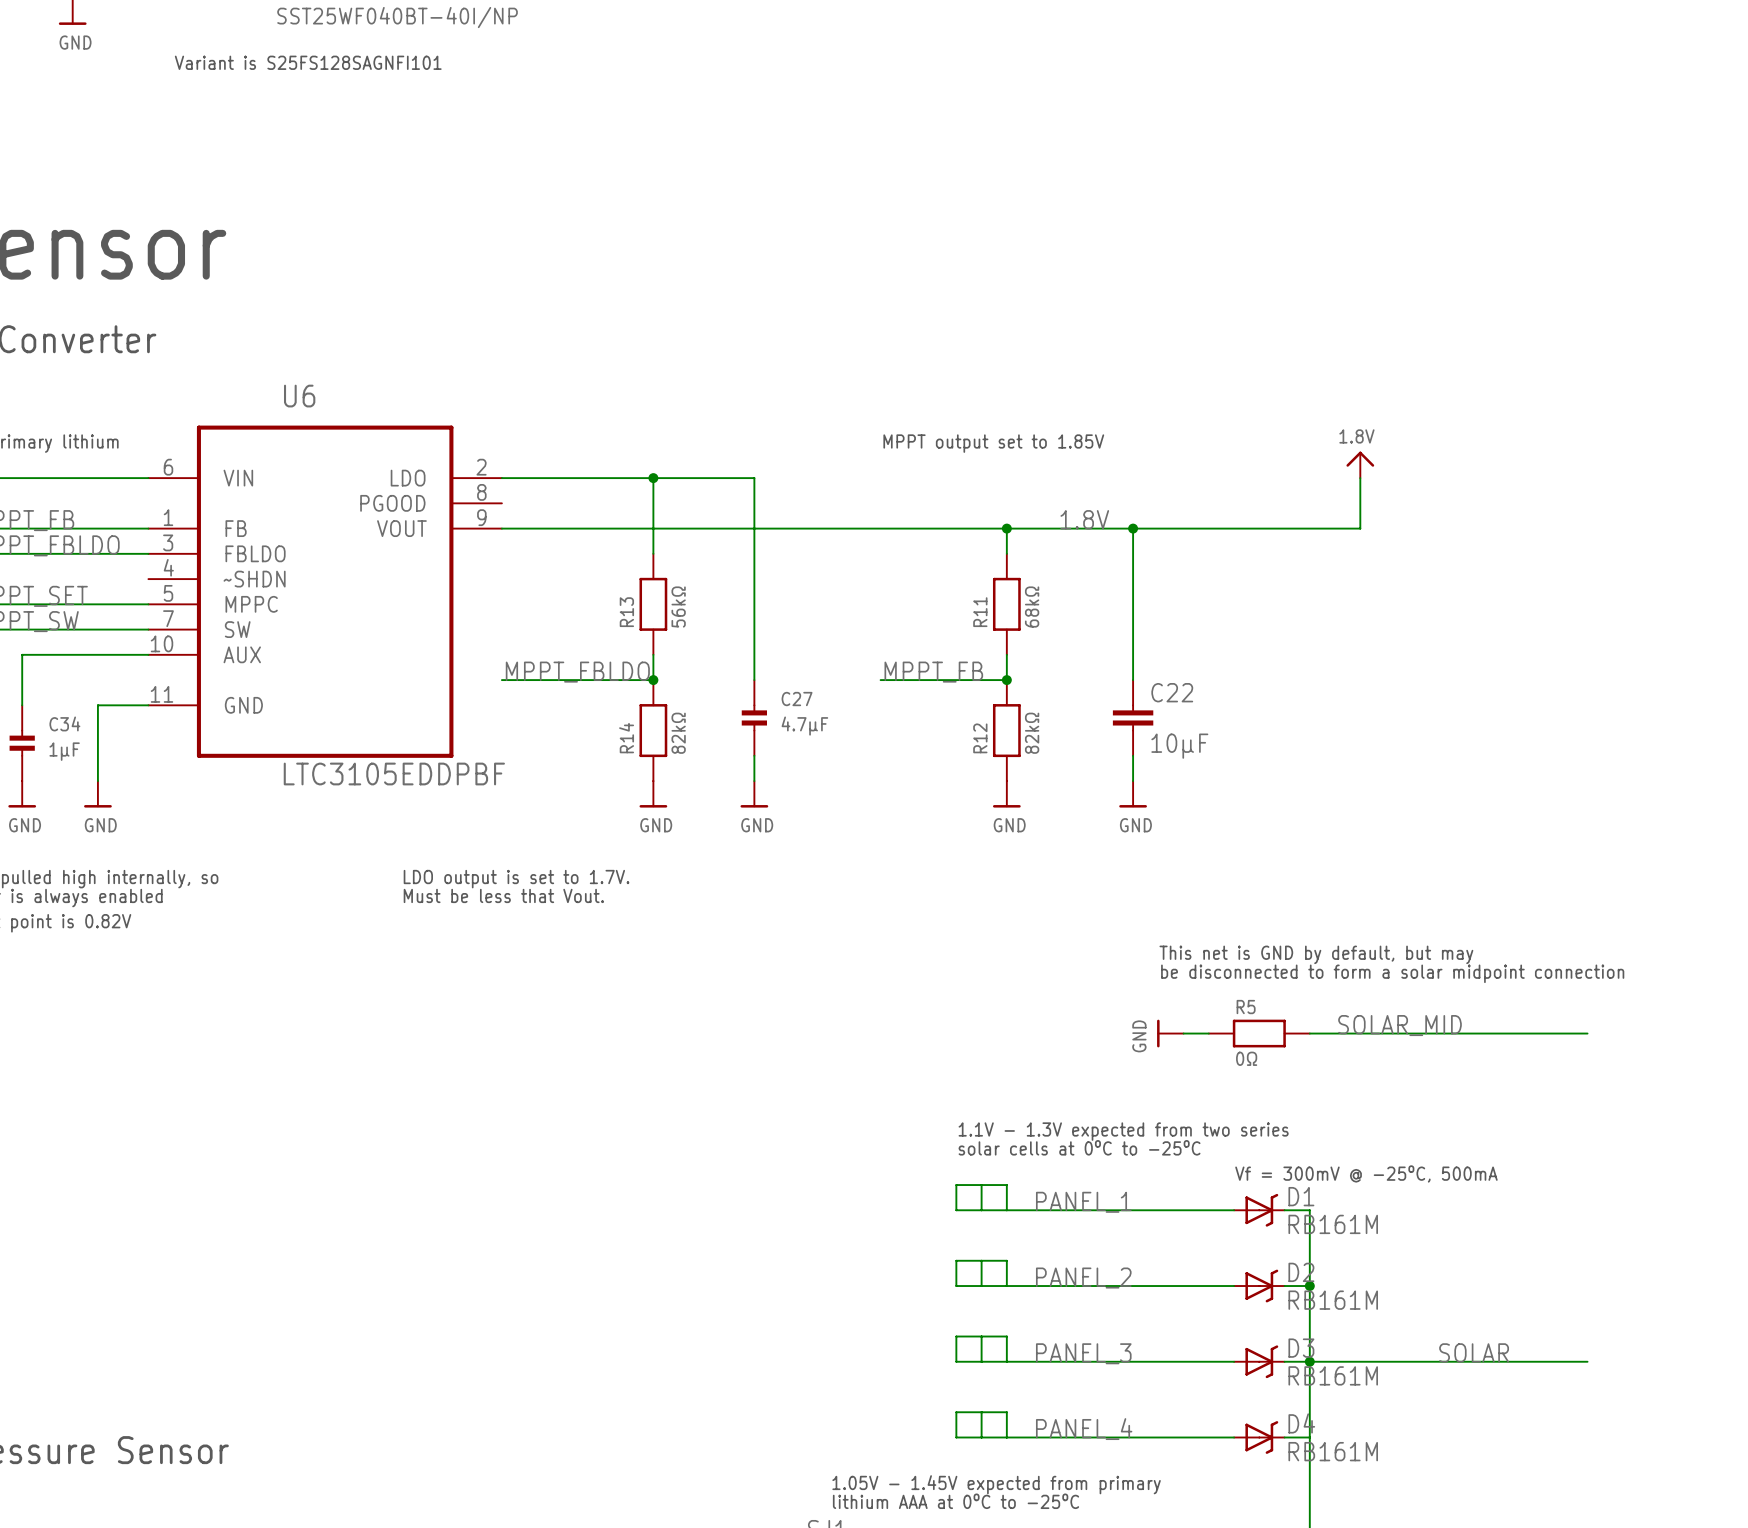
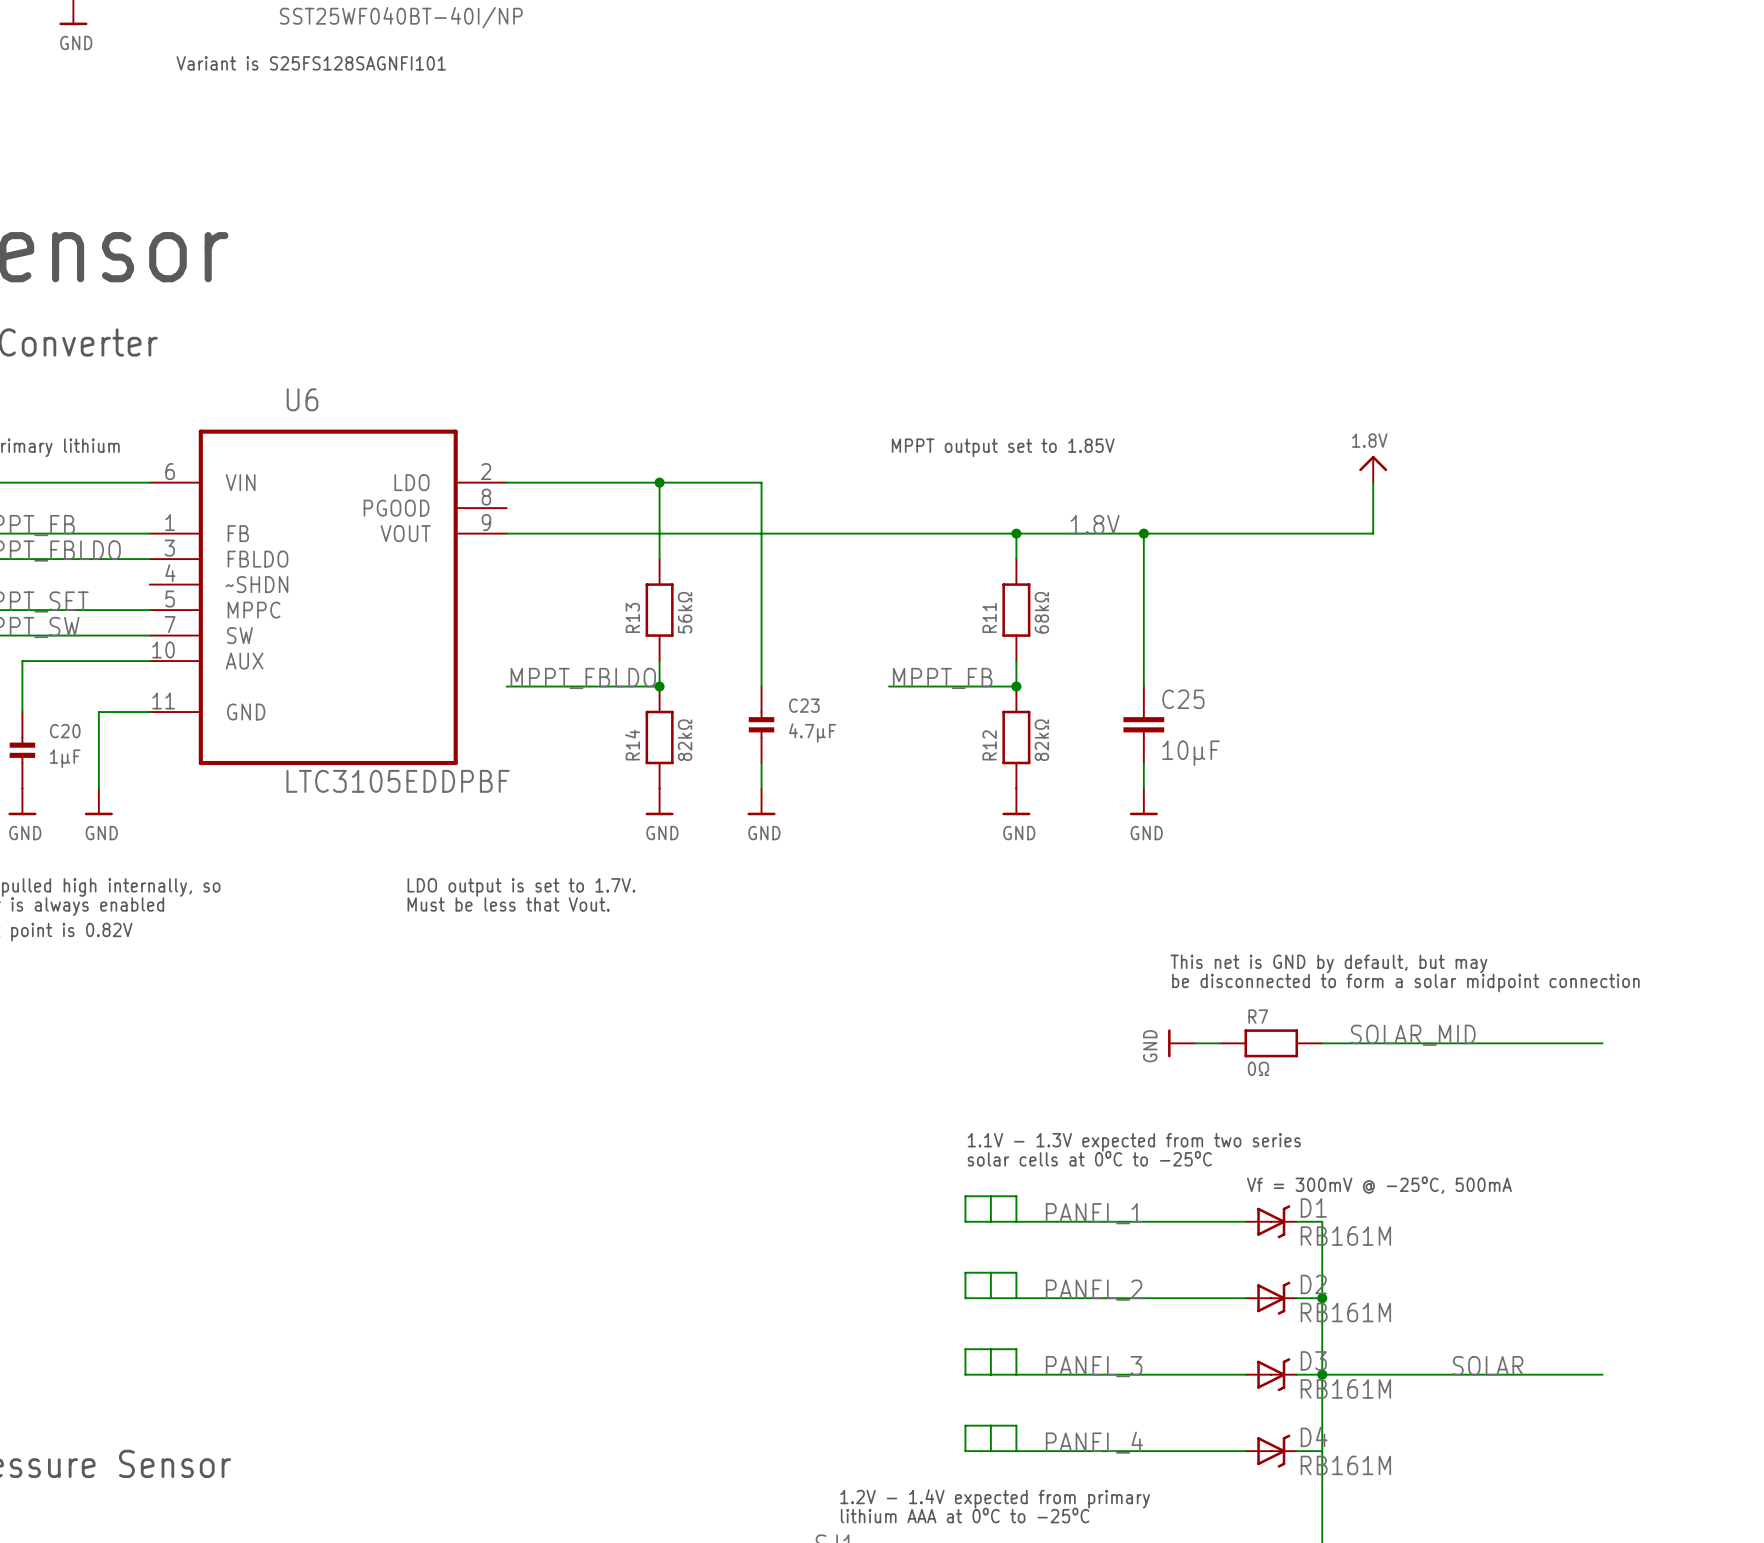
C22 name: C22 (1172, 692) -> C25 (1183, 699)
C27 name: C27 (797, 699) -> C23 (804, 705)
C34 name: C34 (64, 723) -> C20 (65, 731)
R5 name: R5 (1246, 1007) -> R7 (1258, 1016)
text: 1.05V - 1.45V expected from primary (996, 1484) -> 1.2V - 1.4V expected from primary (995, 1498)

